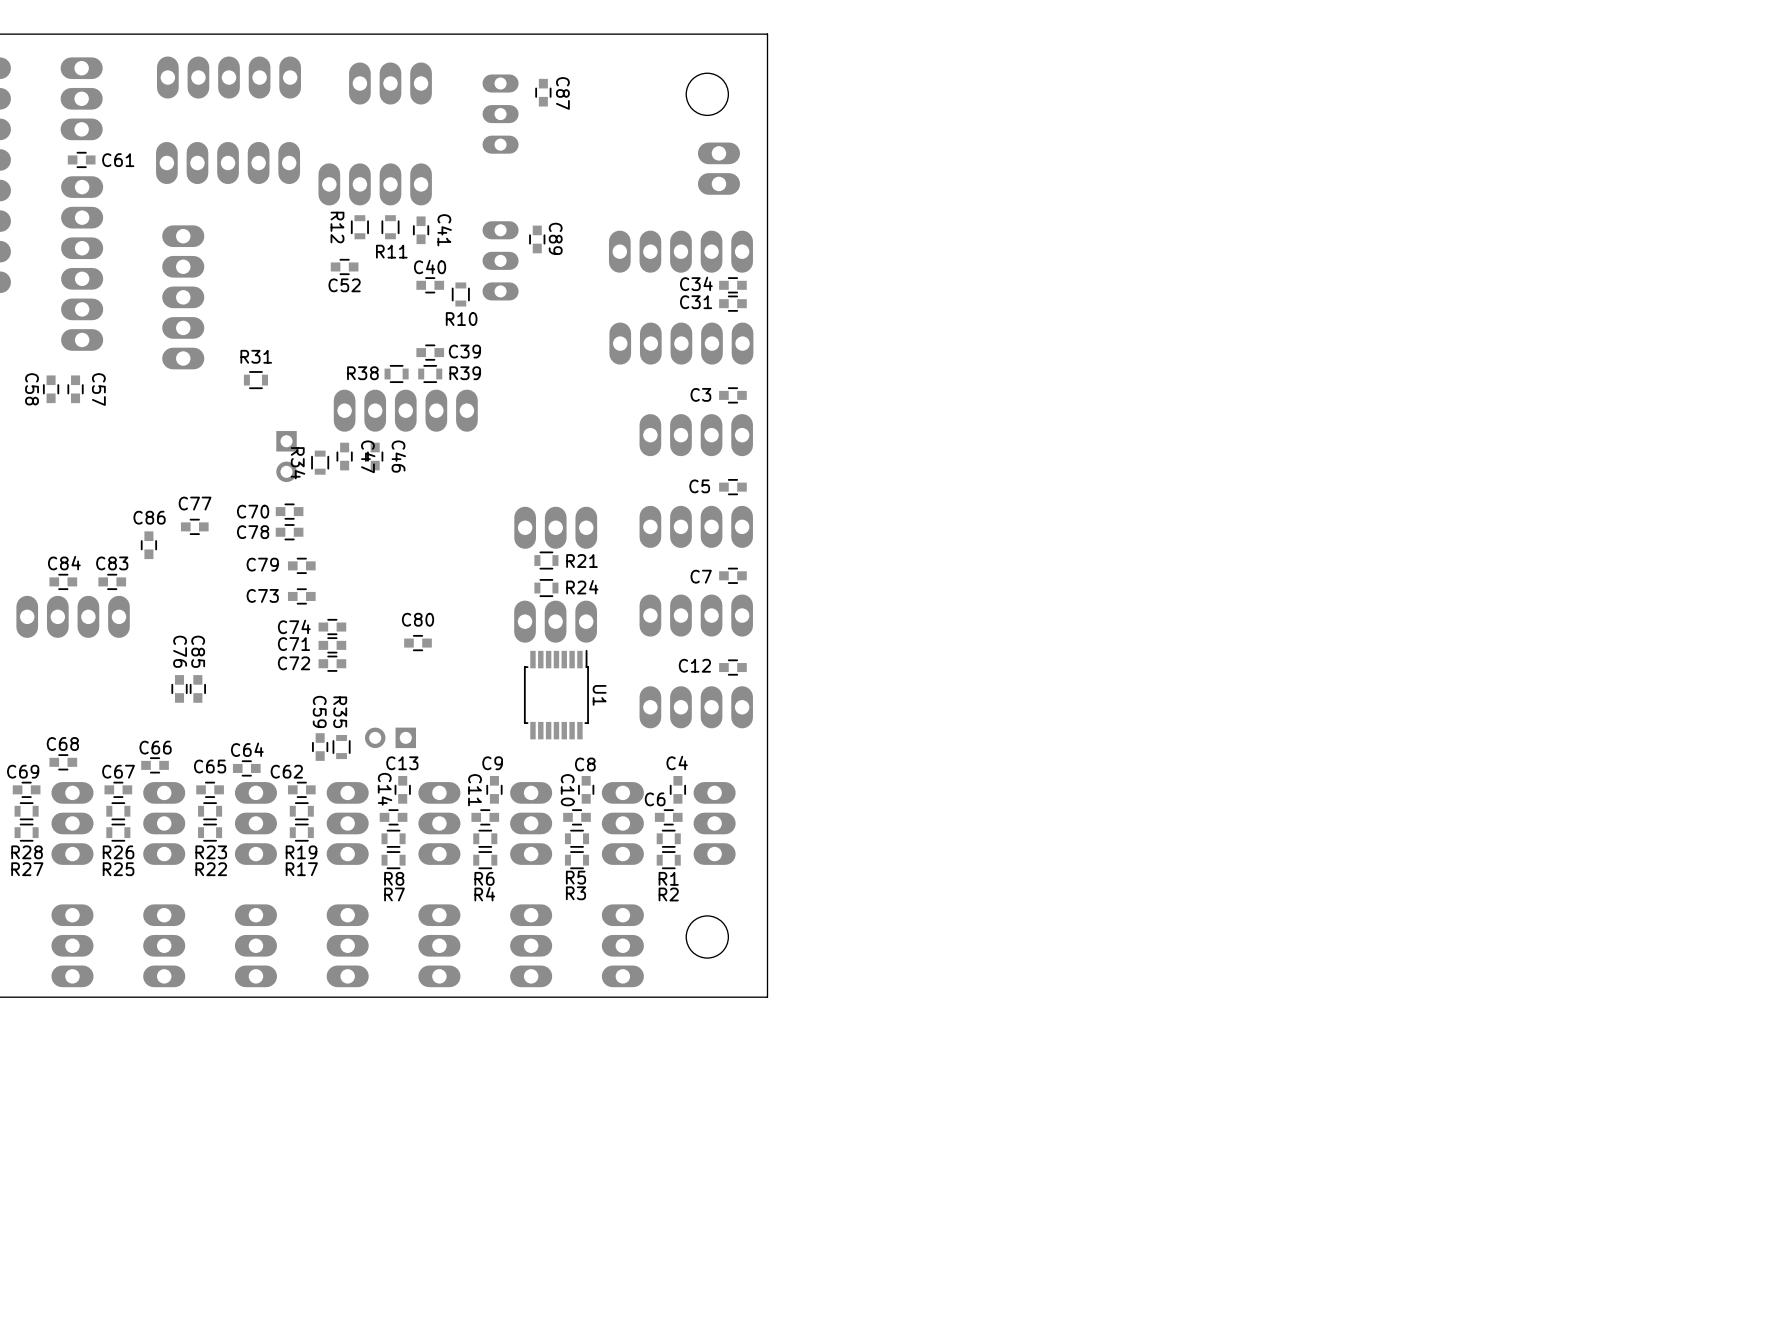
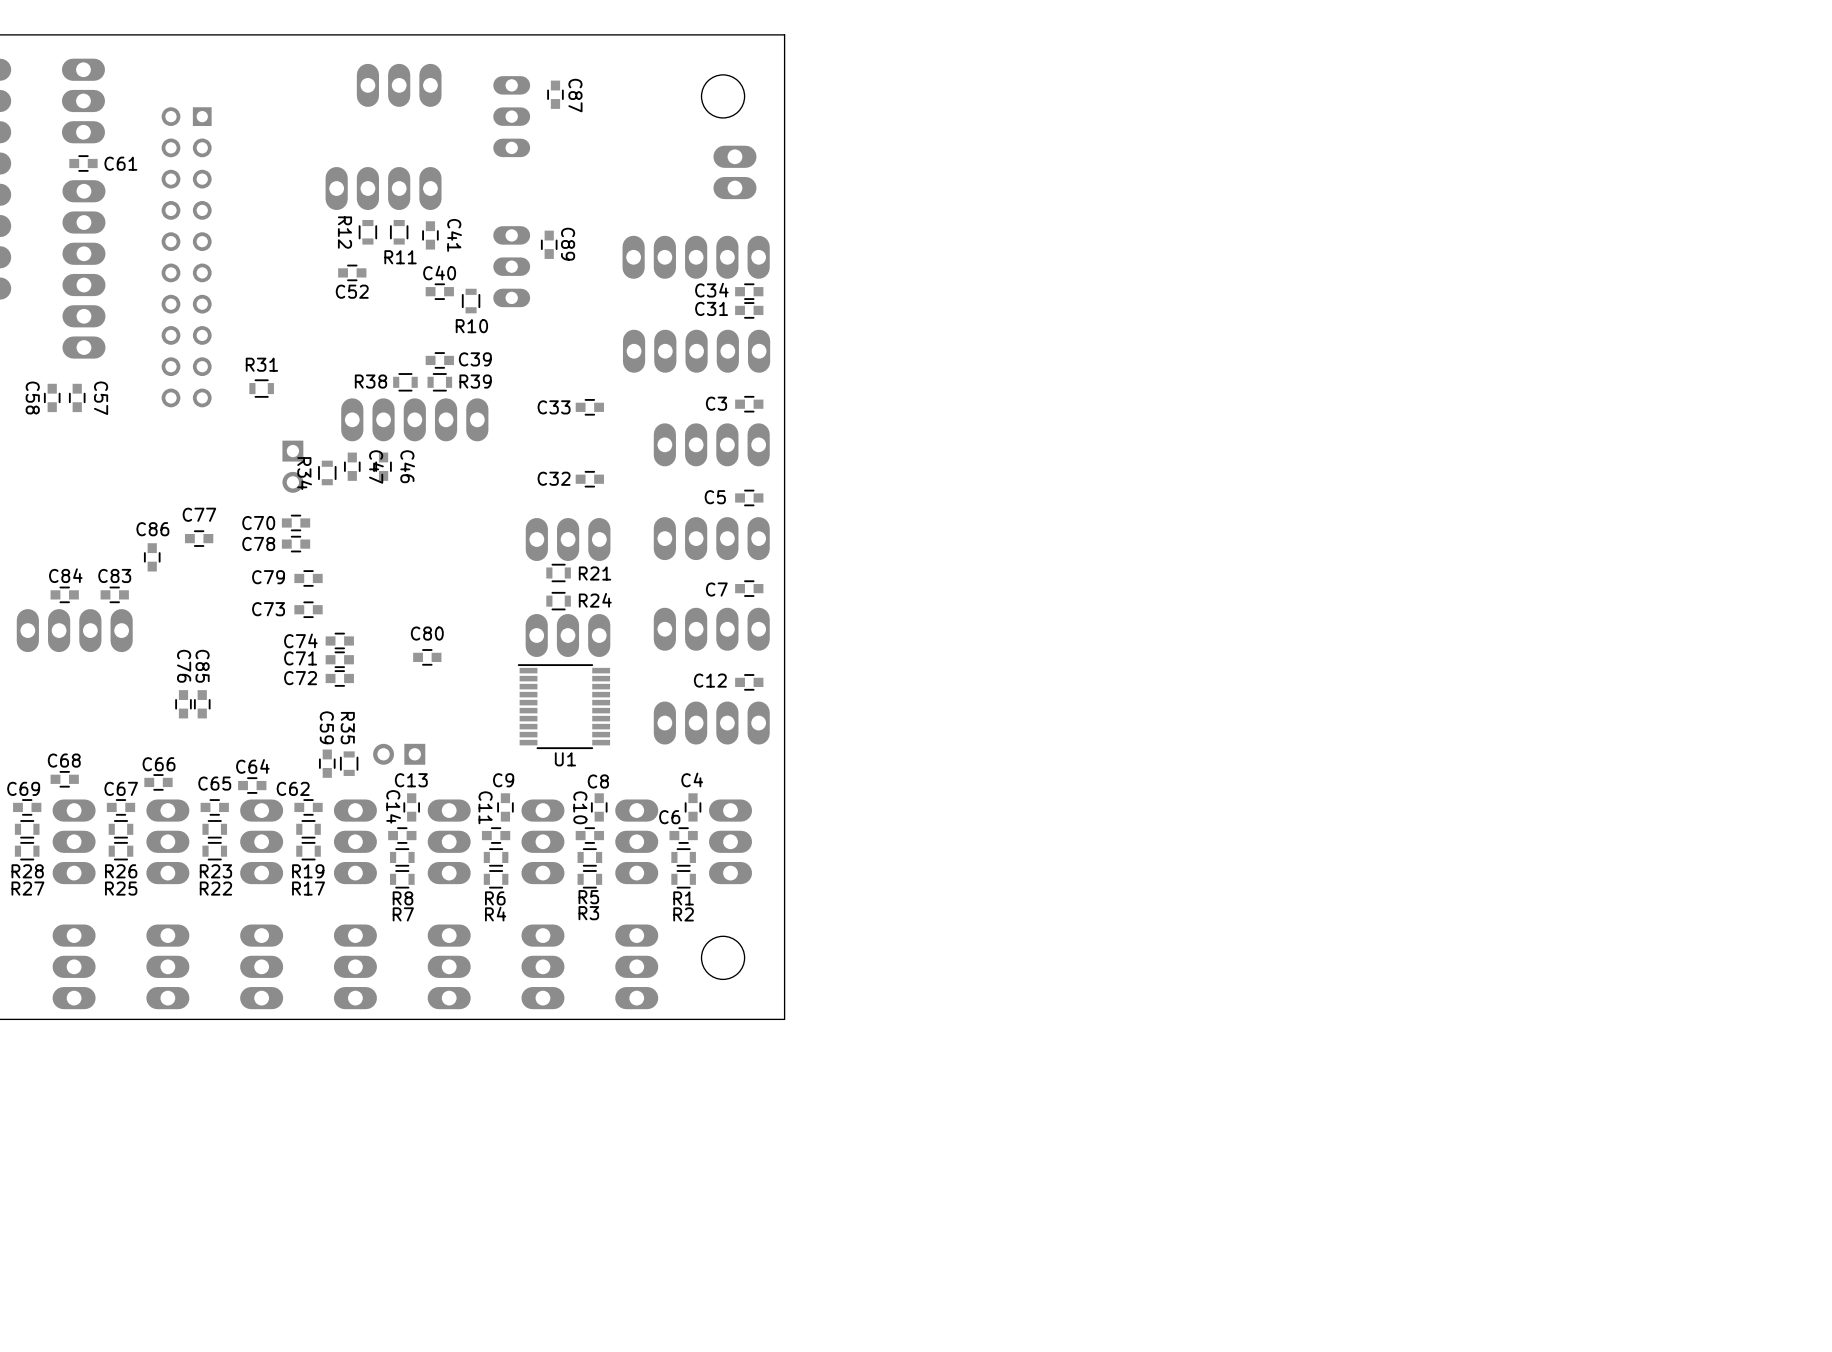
part: (229, 77) -> none
part: (228, 163) -> none
part: none -> (186, 257)
part: (183, 297) -> none
C33: none -> (589, 407)
C32: none -> (589, 479)
U1 footprint: [523, 649, 589, 740] -> [517, 664, 611, 750]
U1 name position: U1 (599, 695) -> U1 (565, 759)

